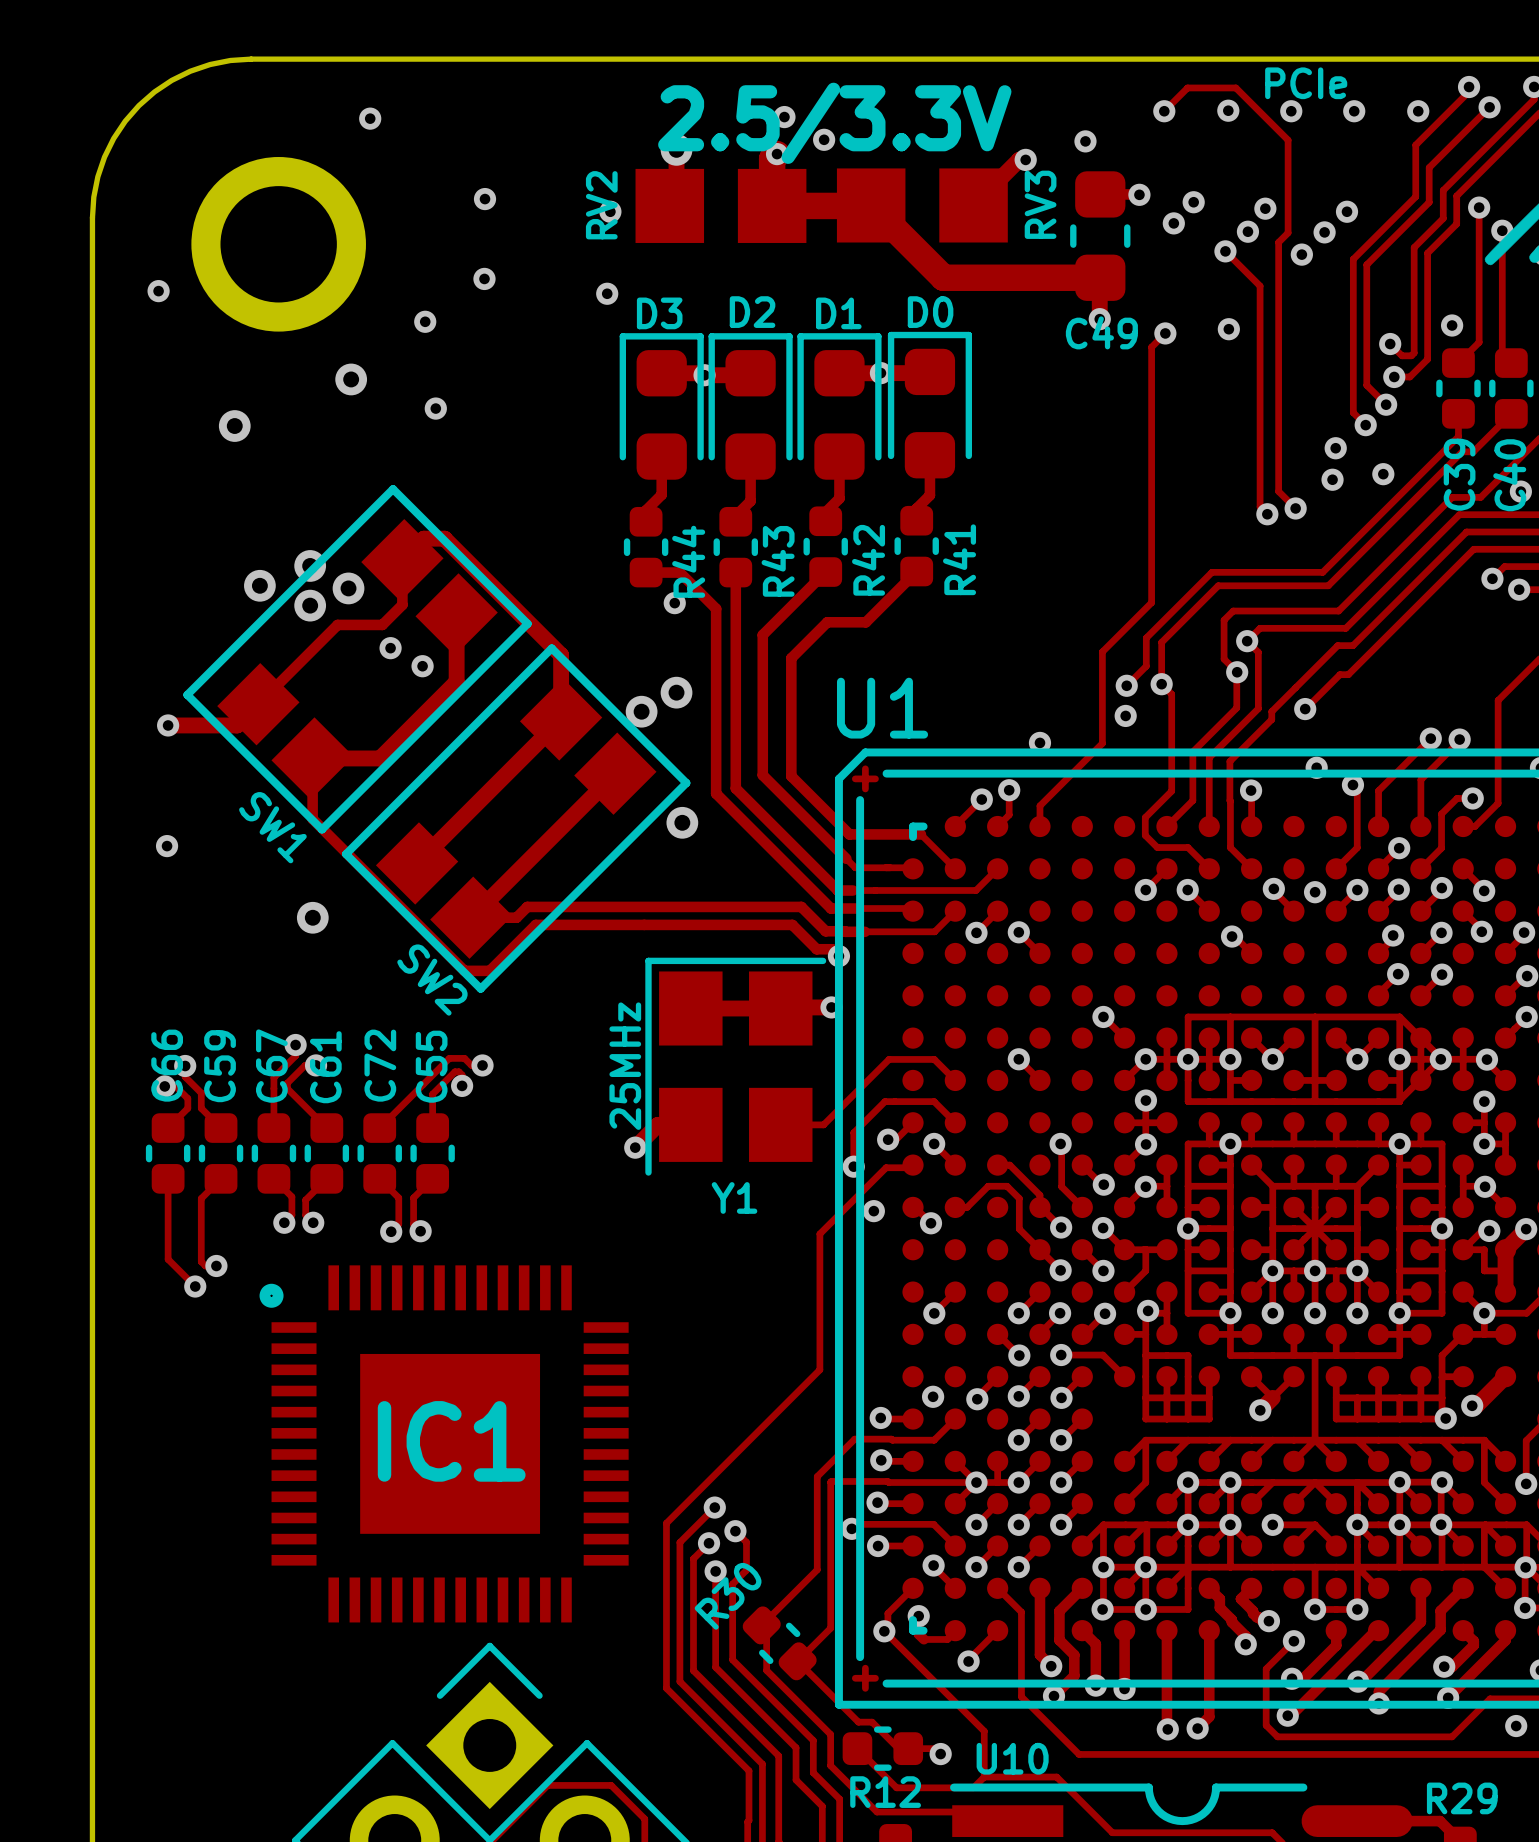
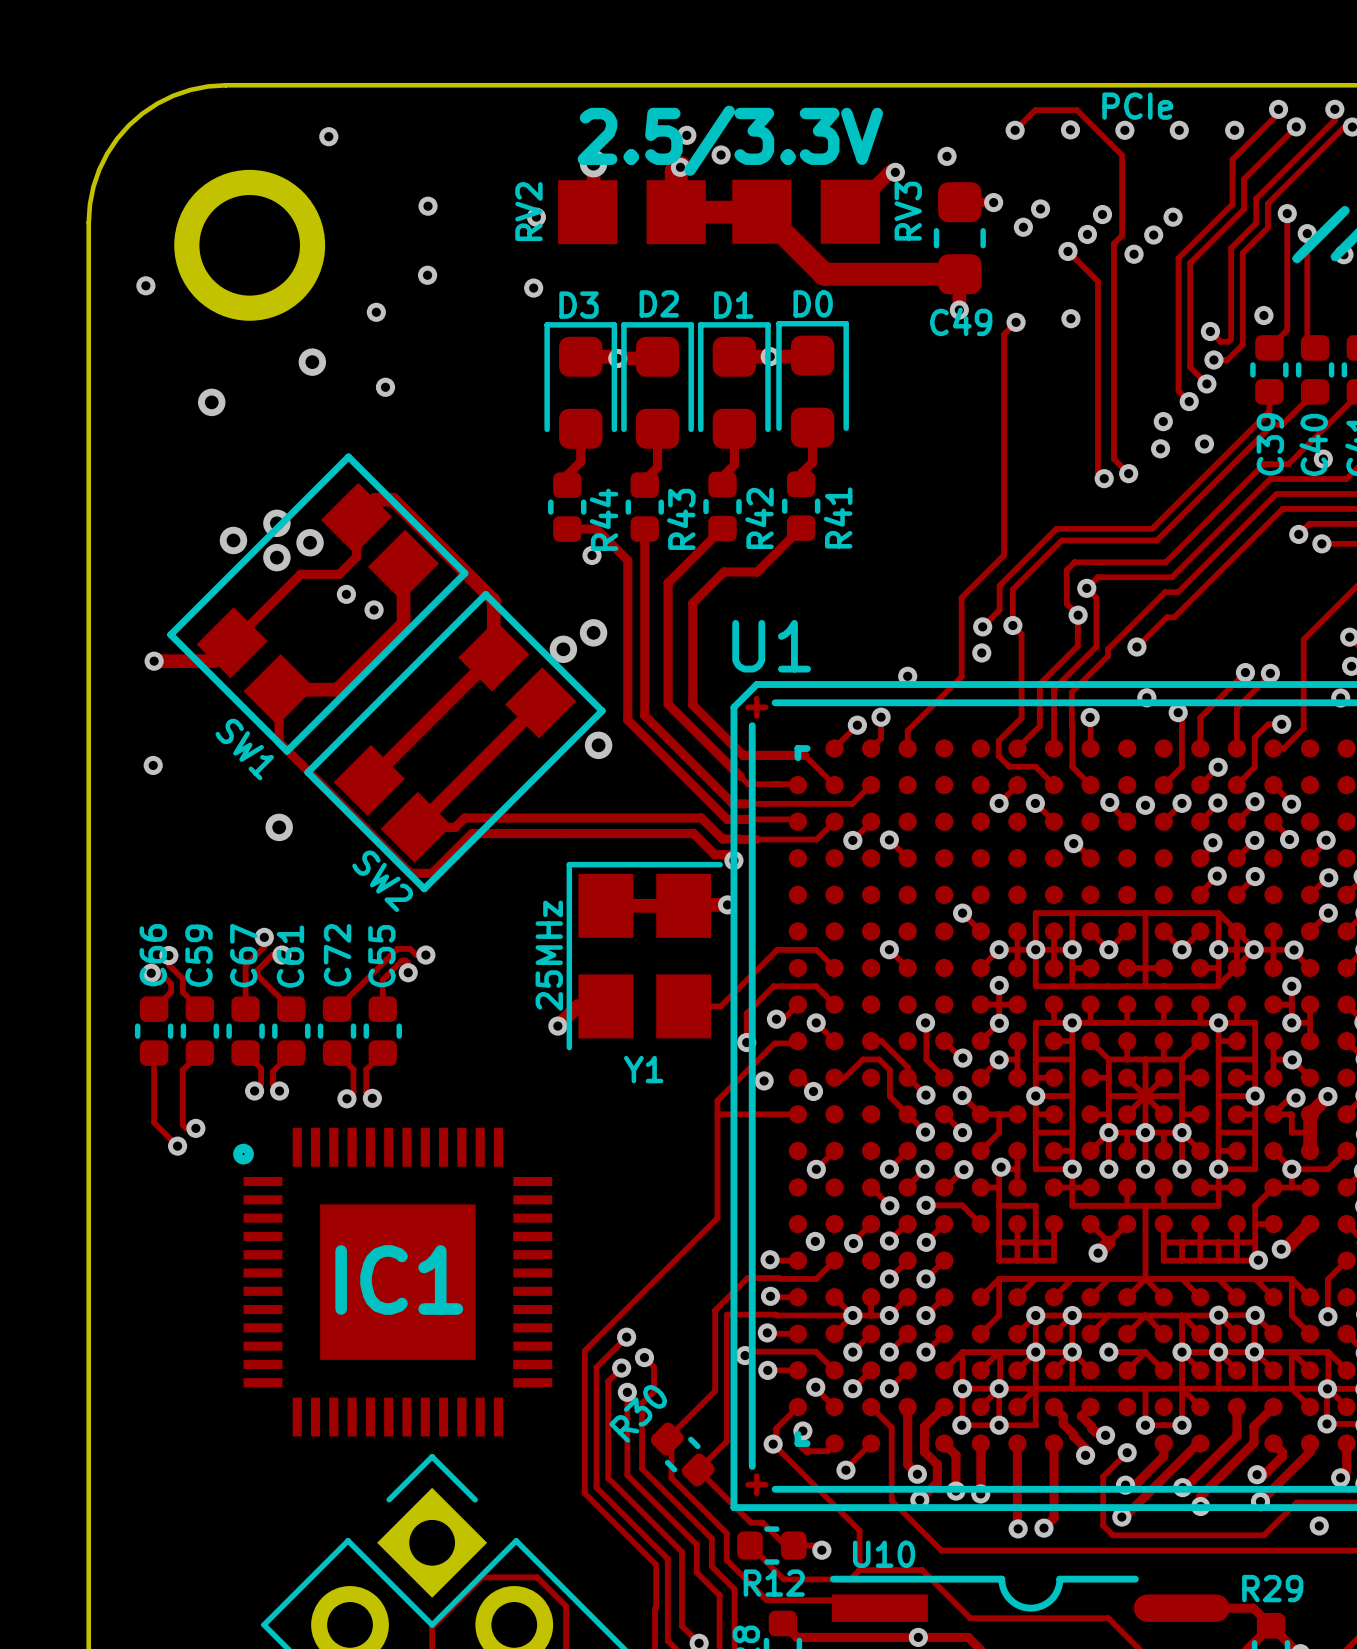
track: none -> (797, 1114) (717, 1115)

